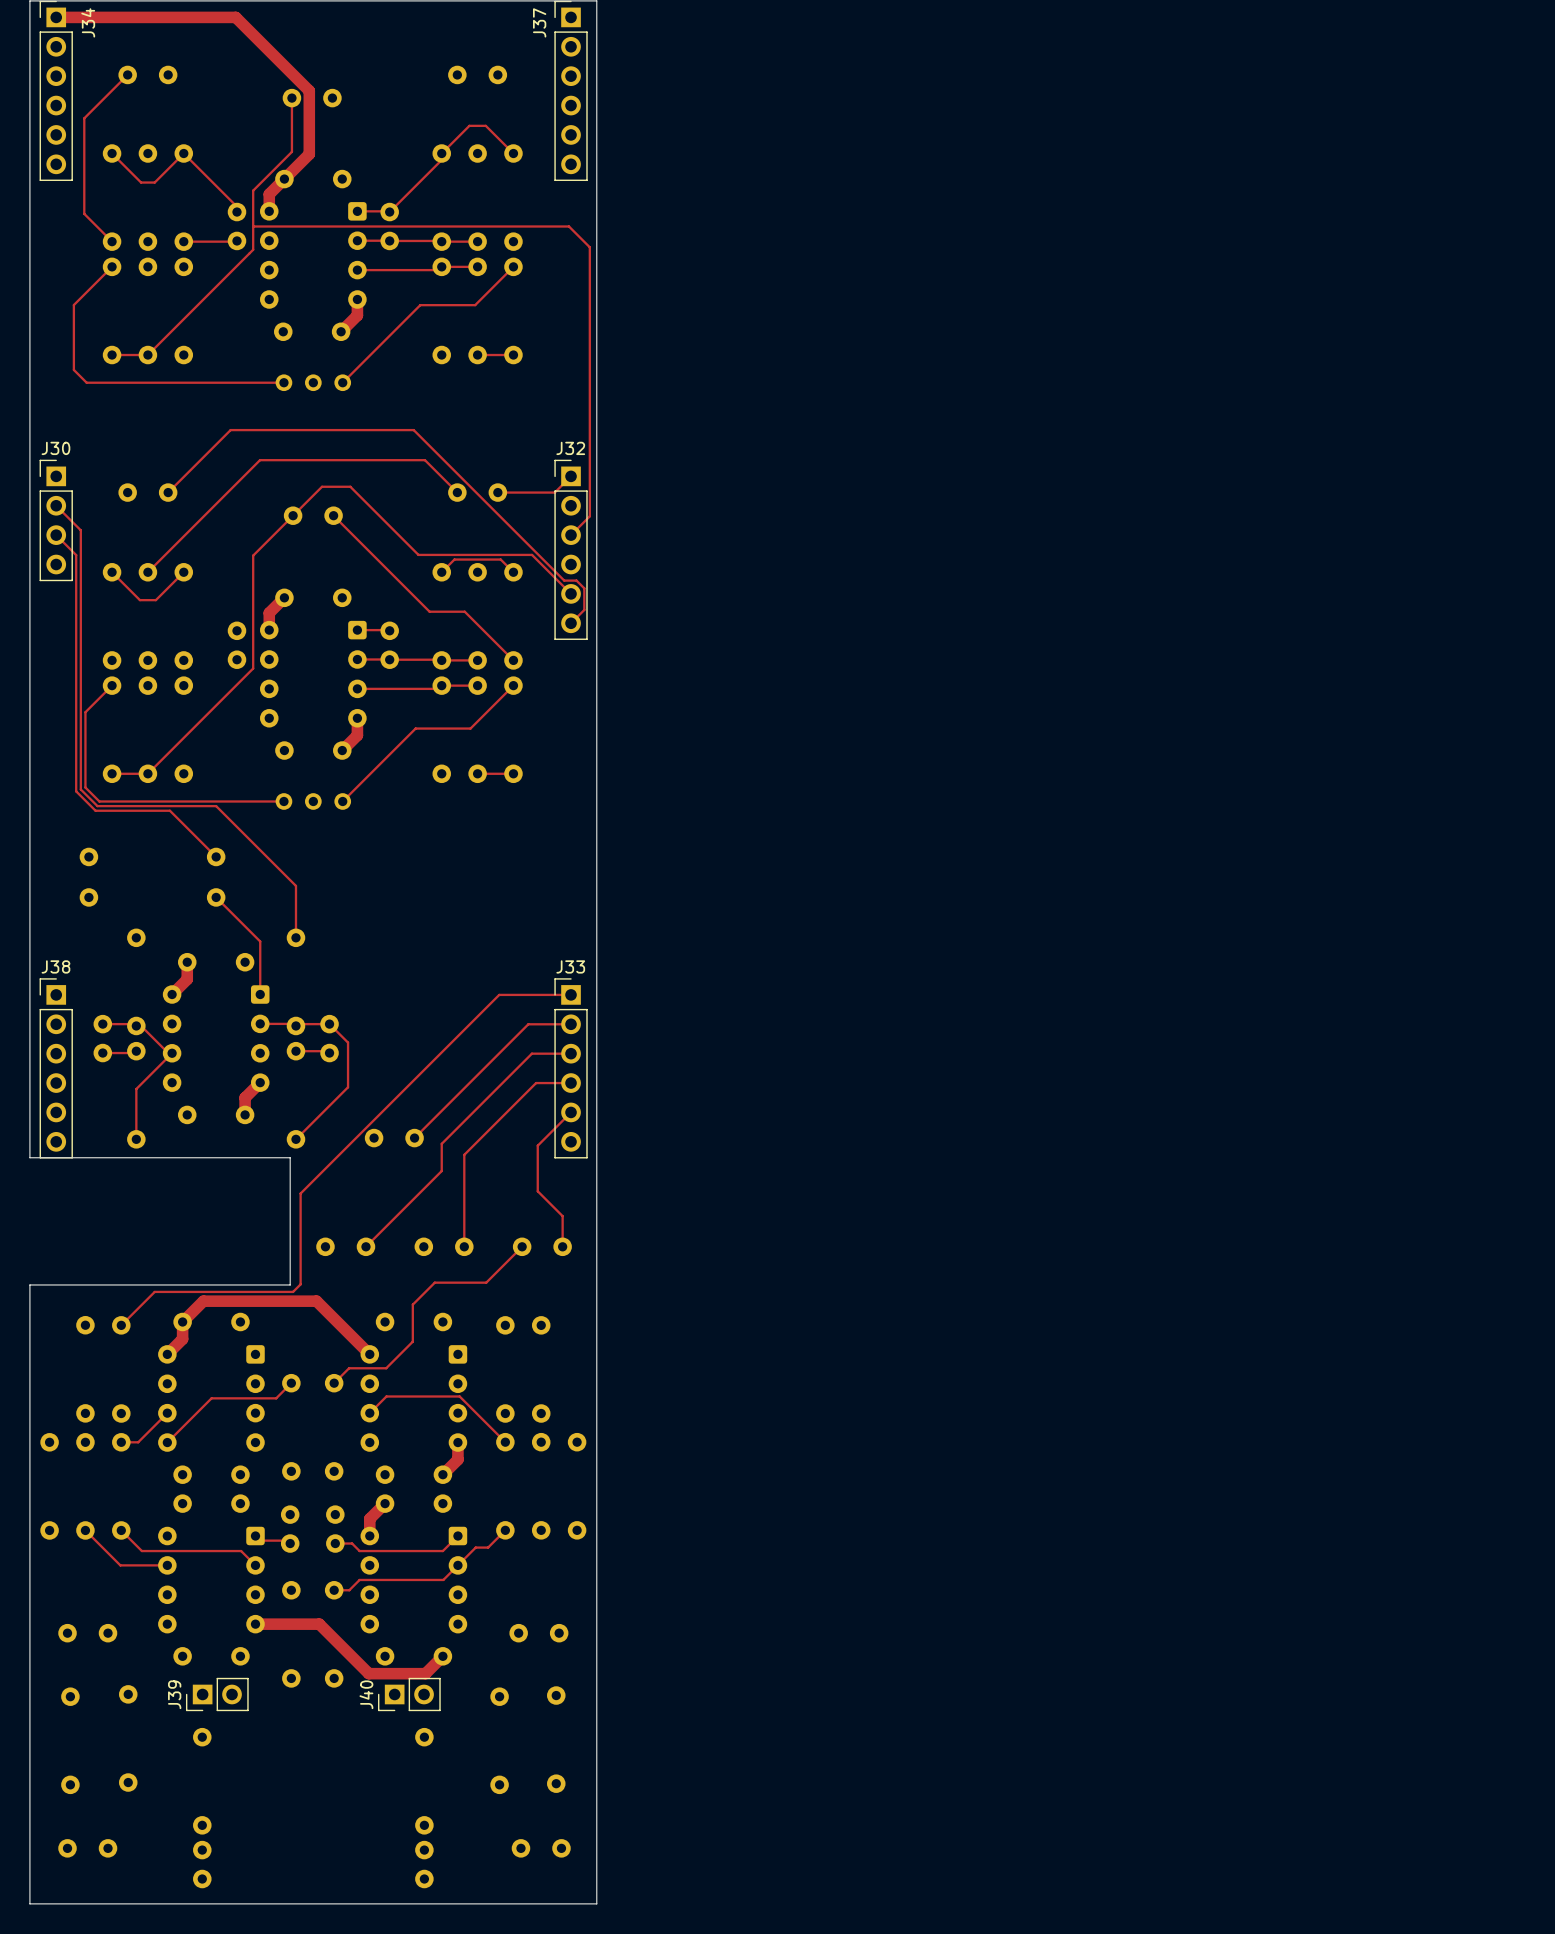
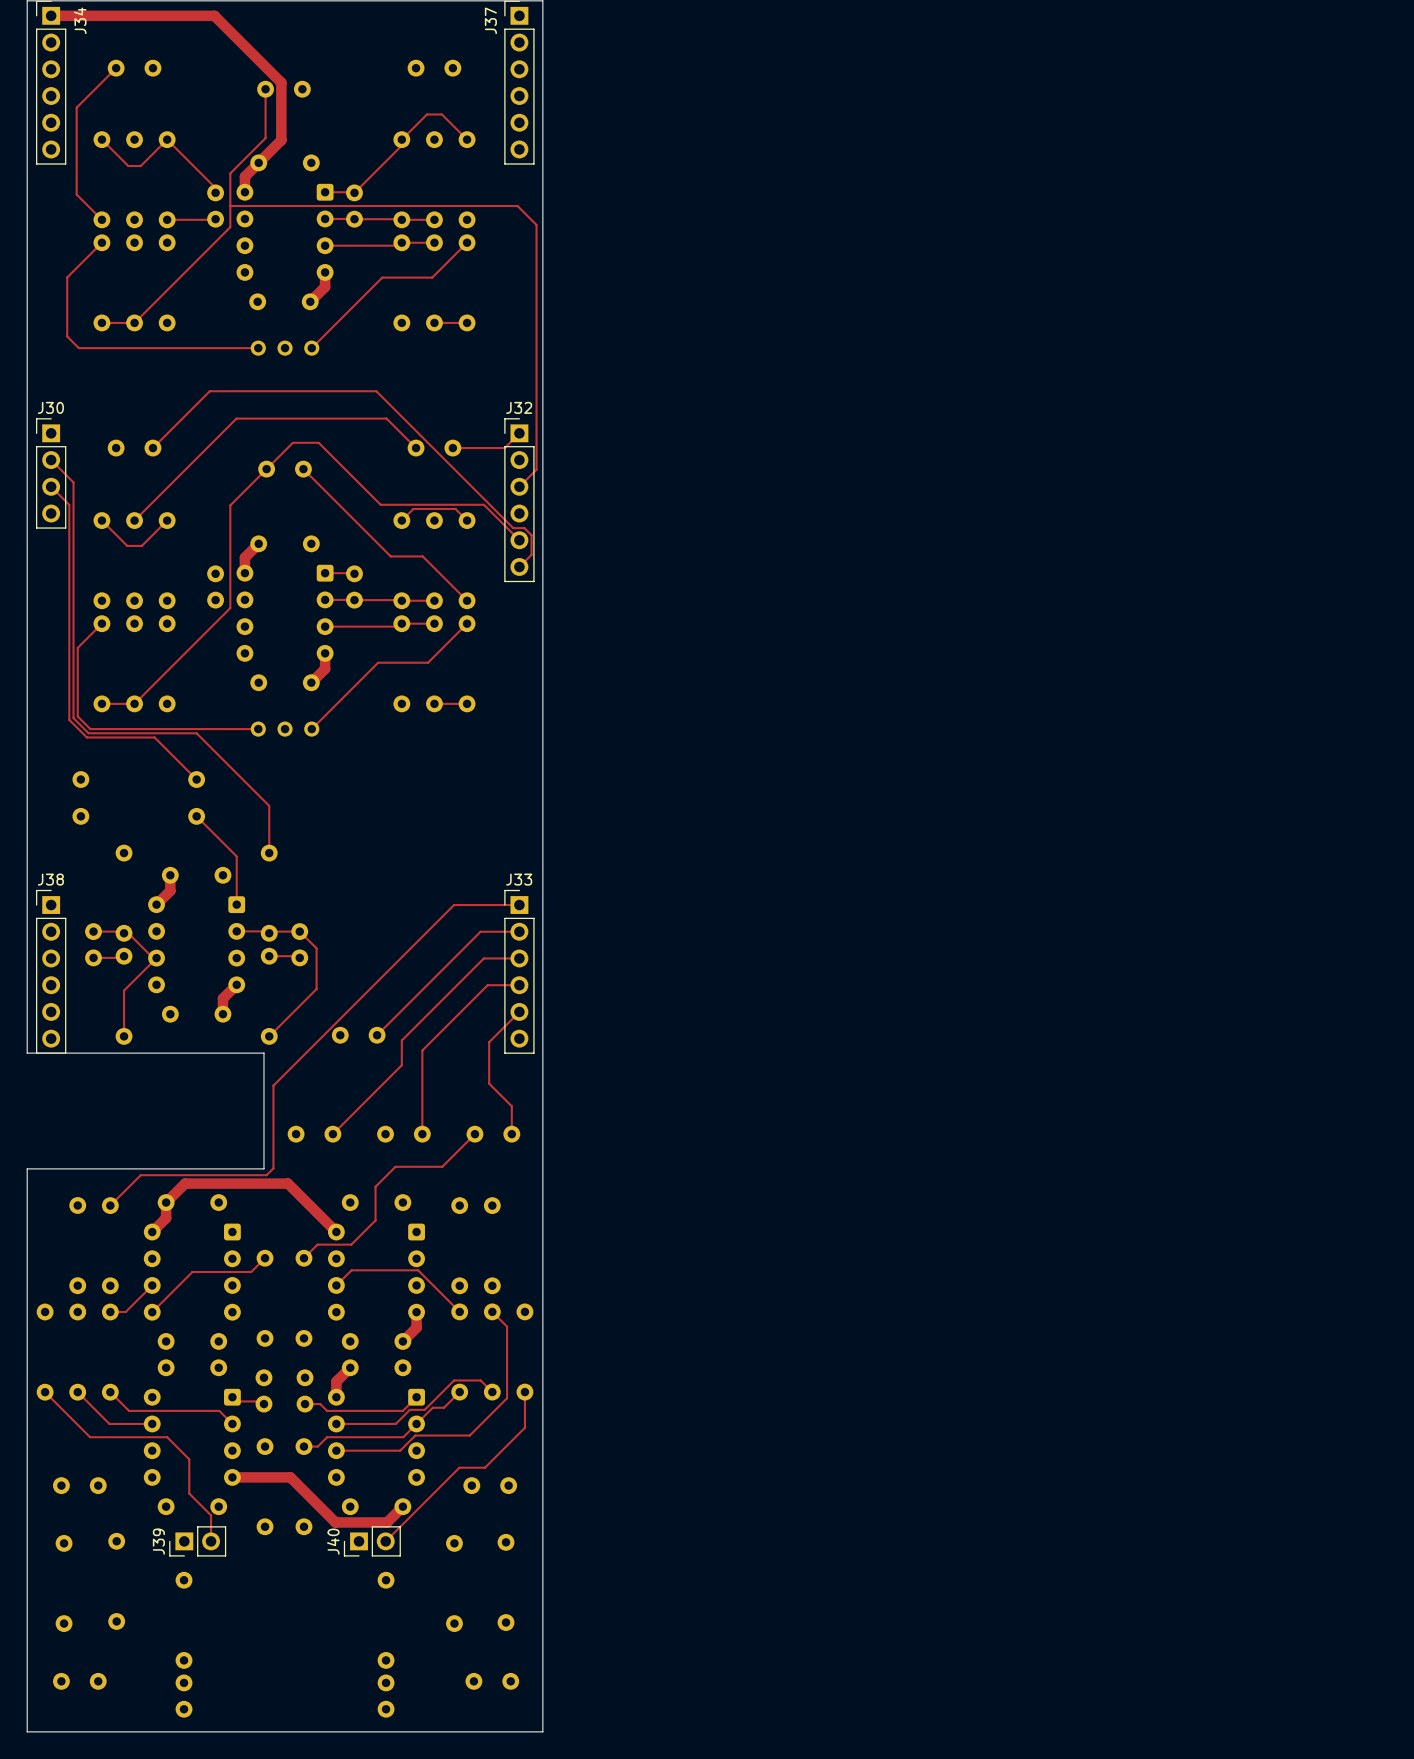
track: none -> (492, 1311) (507, 1326) (507, 1398) (469, 1435) (415, 1435) (400, 1450) (336, 1450)
track: none -> (45, 1392) (90, 1437) (167, 1437) (189, 1459) (189, 1493) (211, 1515) (211, 1541)
track: none -> (492, 1392) (480, 1380) (454, 1380) (424, 1409) (409, 1409) (395, 1423) (336, 1423)
track: none -> (524, 1392) (524, 1427) (484, 1467) (459, 1467) (385, 1541)

